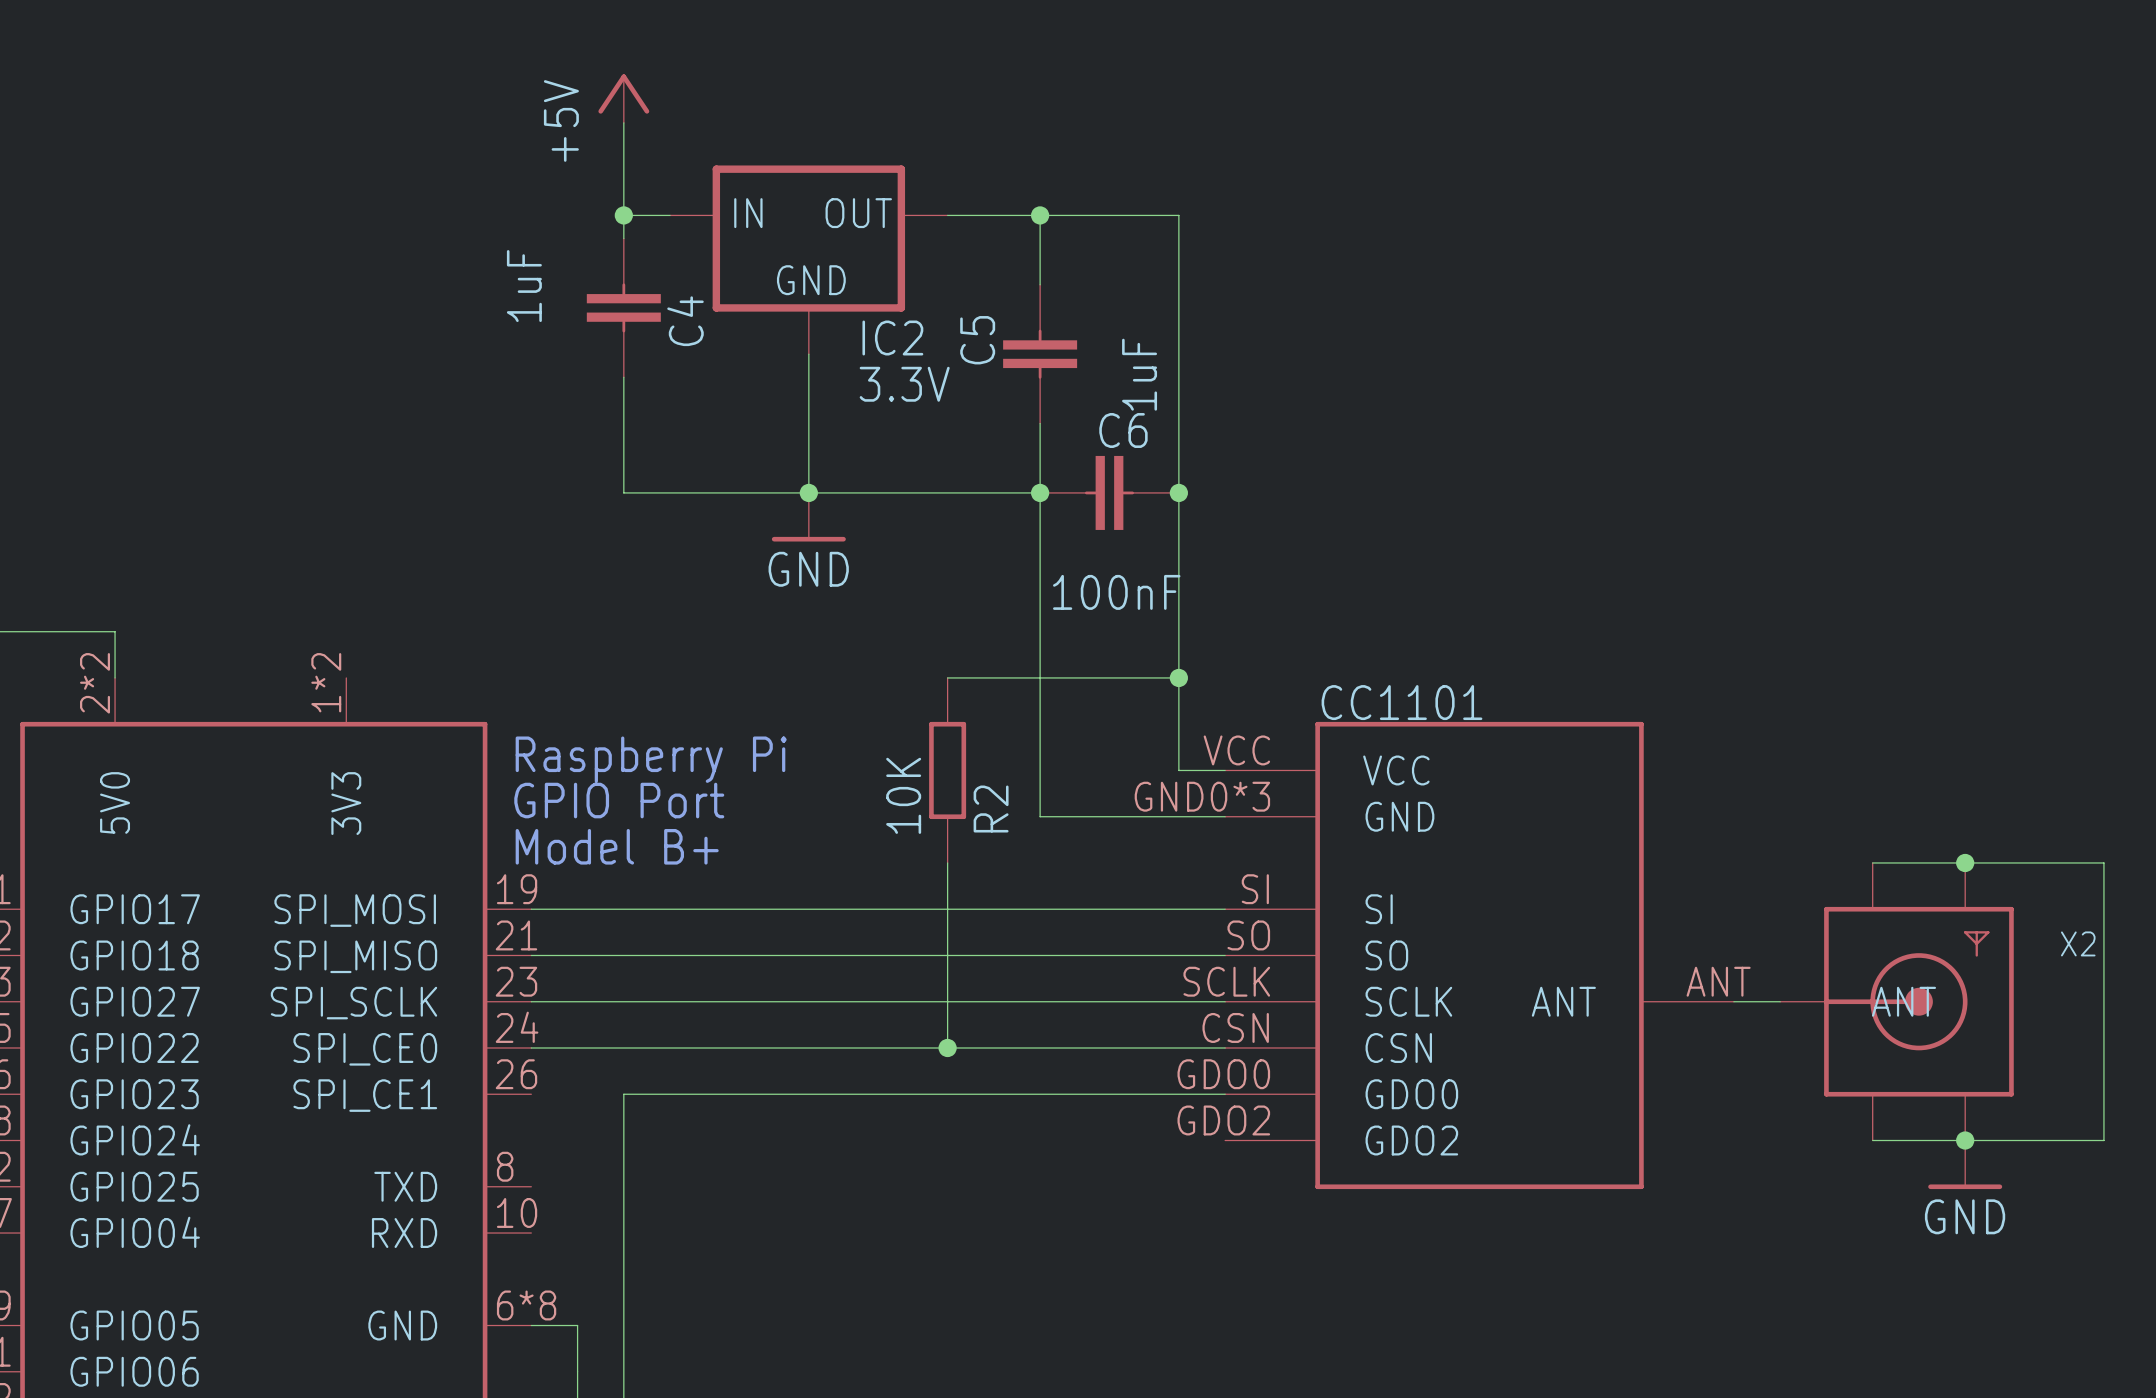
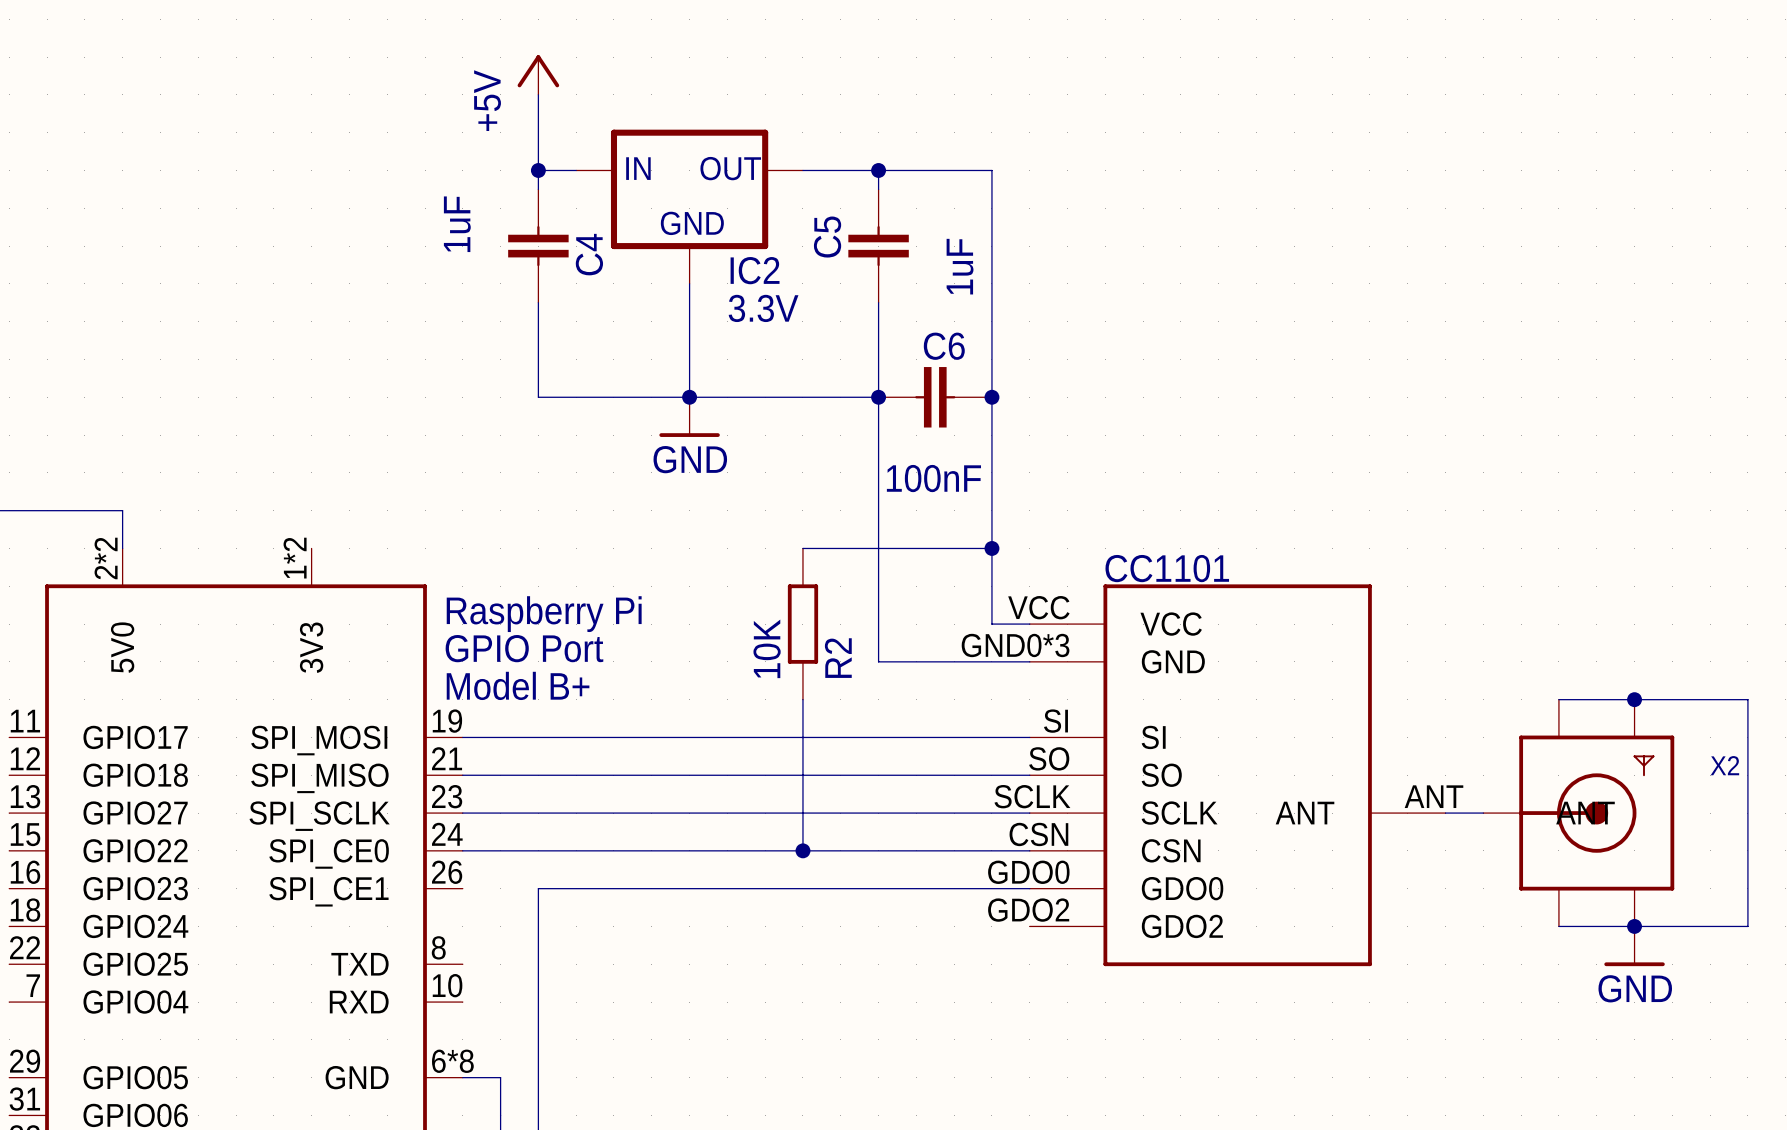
C5 position: (1040, 354) -> (878, 246)

